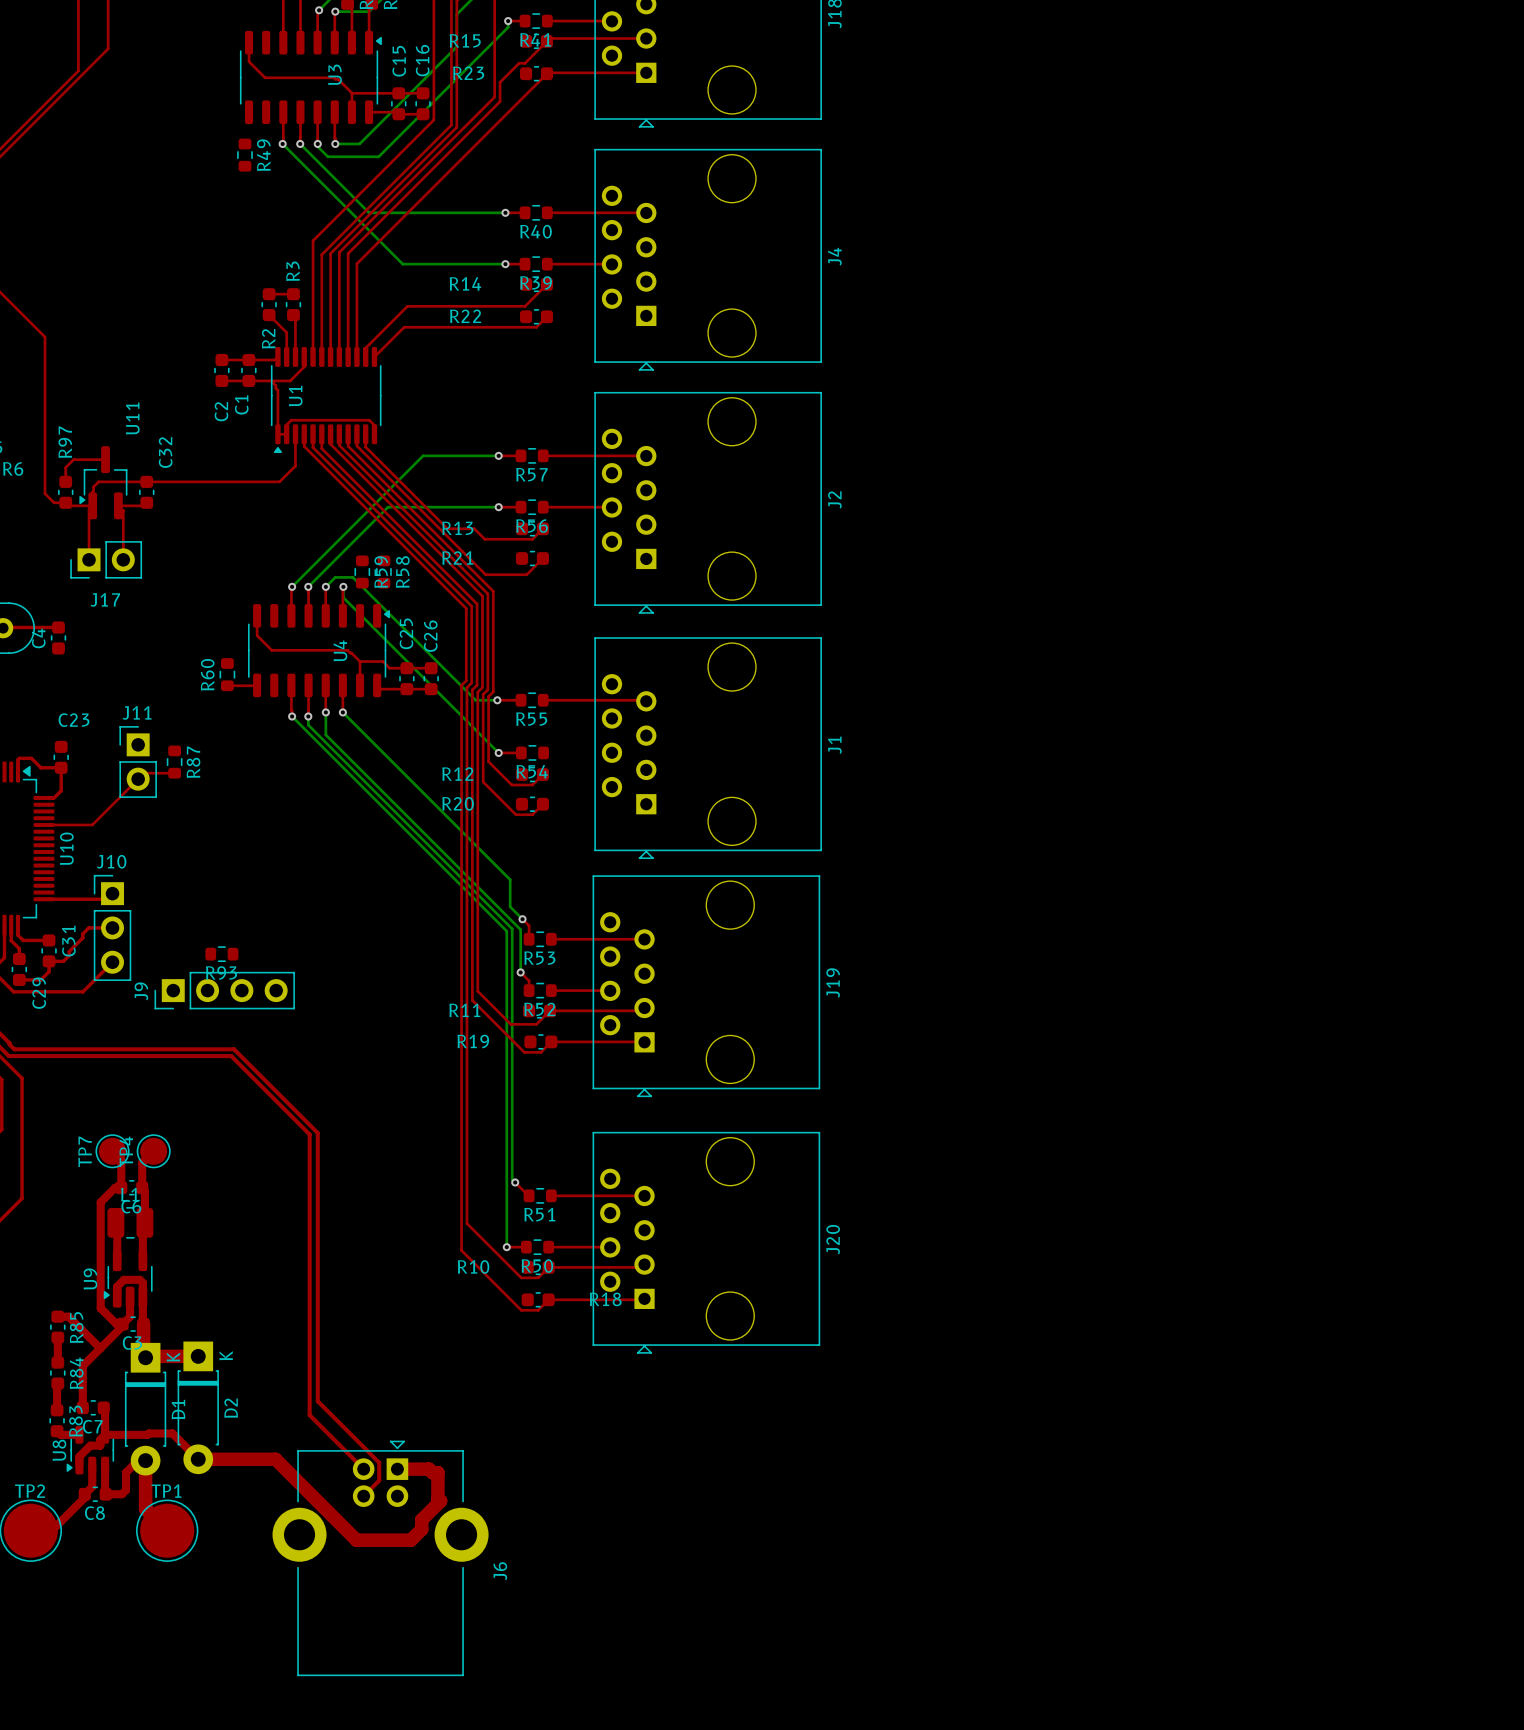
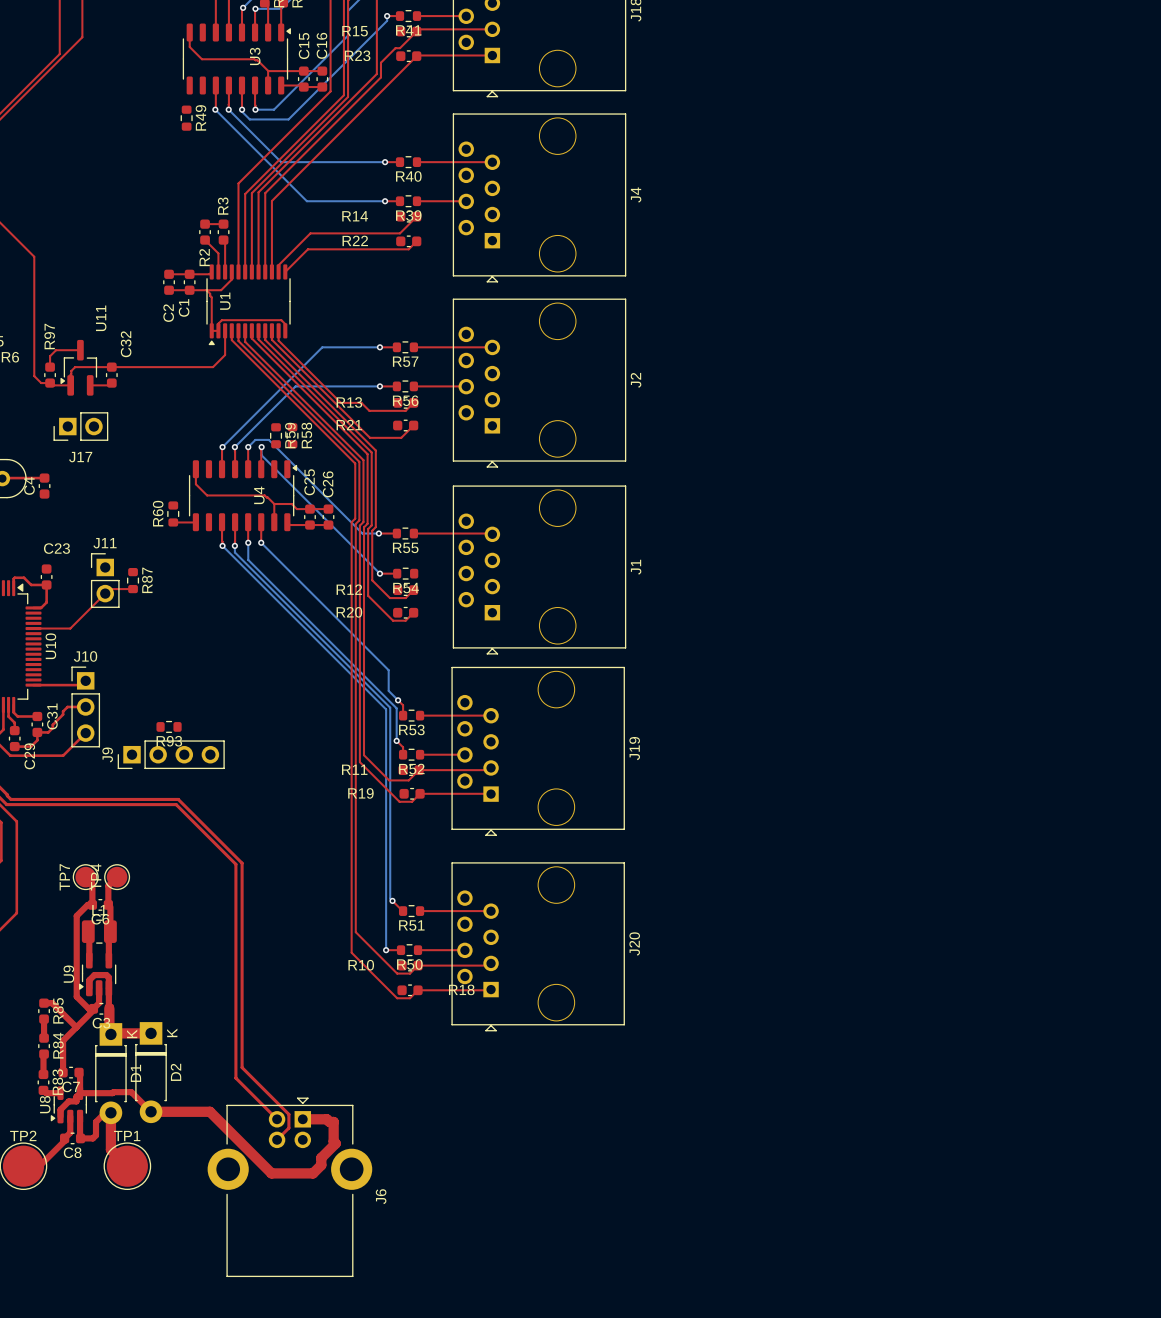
top track: (92, 505) (89, 509) (89, 559) -> none
top track: (118, 505) (123, 510) (123, 559) -> none

